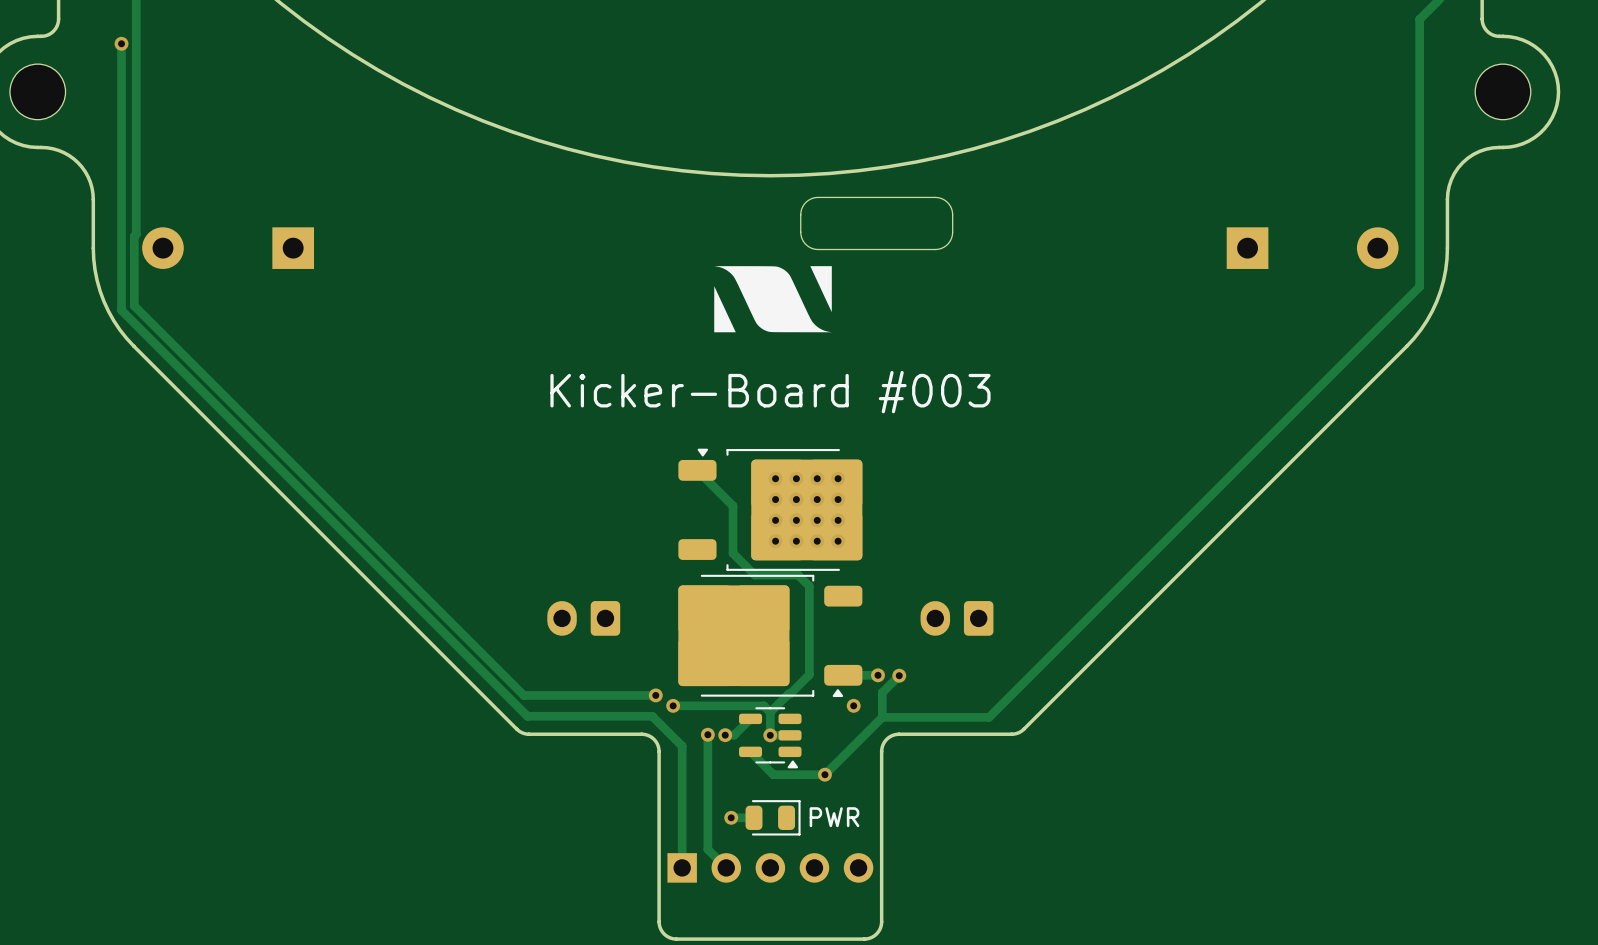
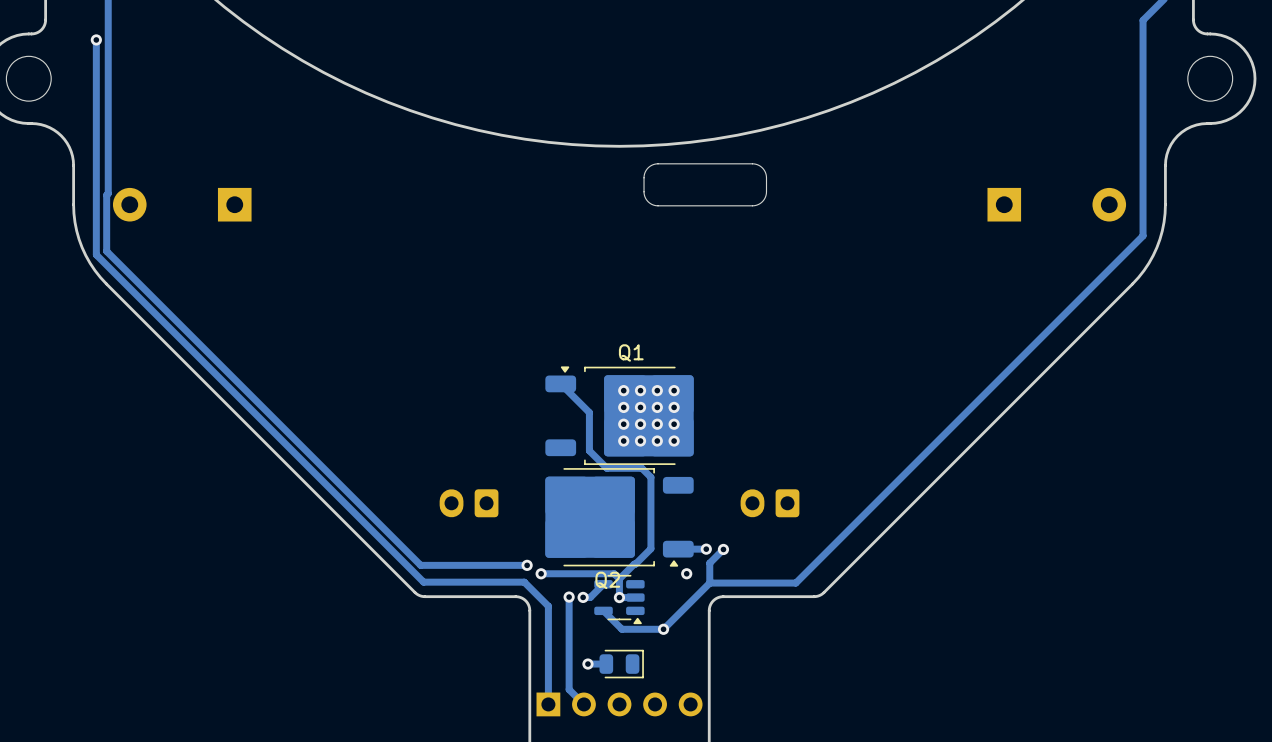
drawing: [714, 266, 832, 333] -> none
text: Kicker-Board #003 (770, 392) -> none
Q1 name: none -> Q1 (631, 352)
Q2 name: none -> Q2 (607, 580)
text: PWR (834, 817) -> none

